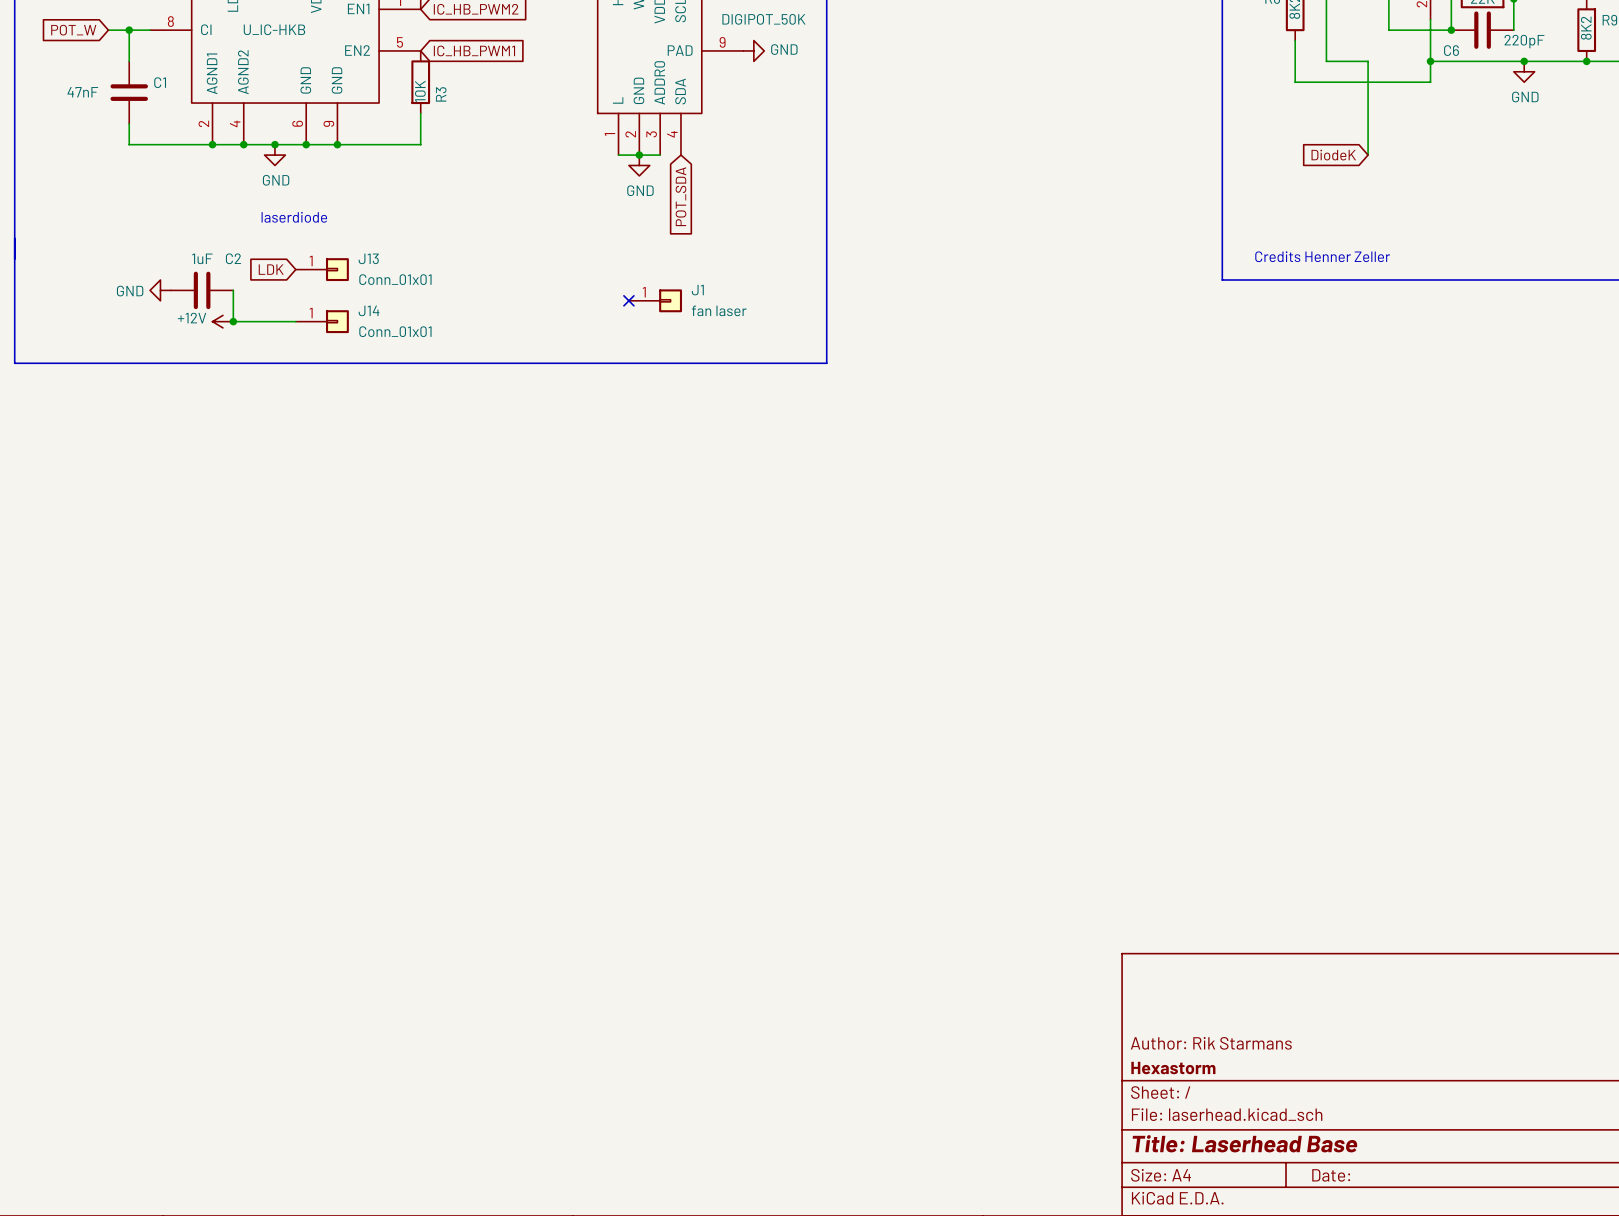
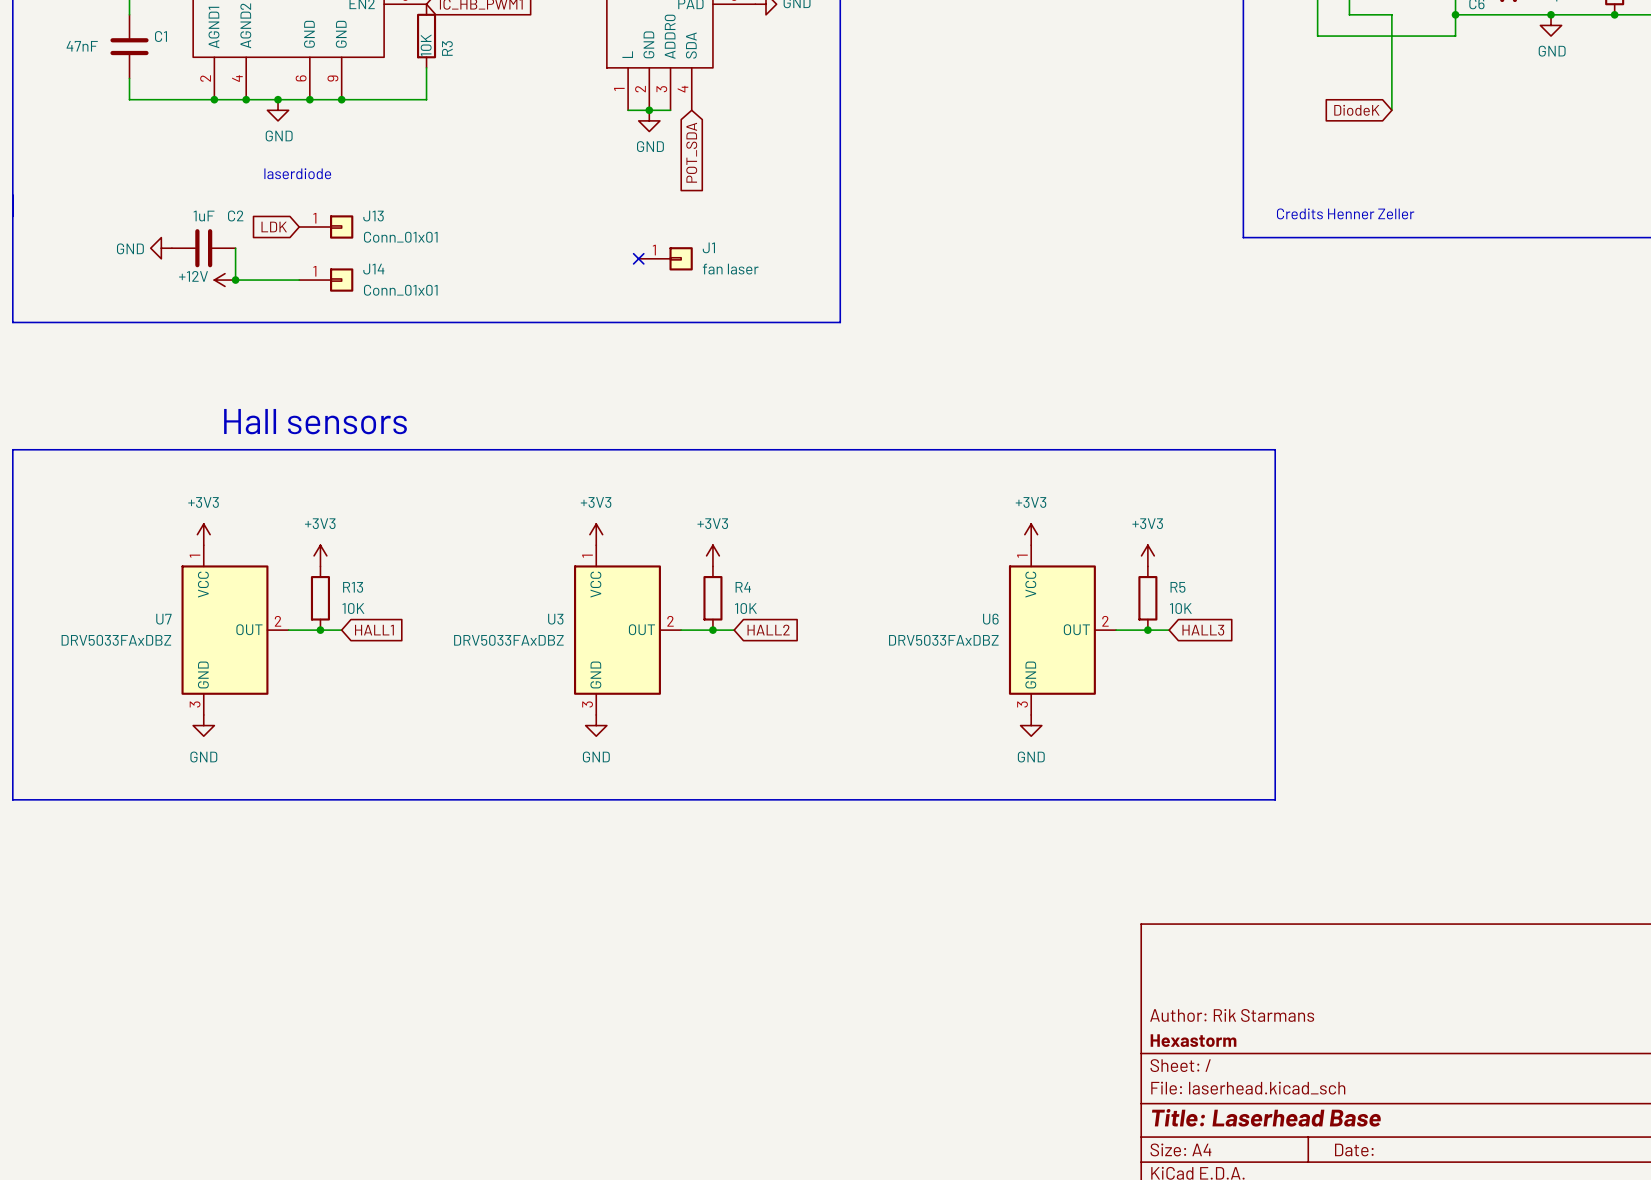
text: none -> Hall sensors (315, 421)
line: none -> (12, 449) (1275, 449) (1275, 799) (12, 799) (12, 449)
power symbol: none -> +3V3 (203, 534)
power symbol: none -> +3V3 (596, 534)
power symbol: none -> +3V3 (1031, 534)
power symbol: none -> +3V3 (320, 555)
power symbol: none -> +3V3 (712, 555)
power symbol: none -> +3V3 (1147, 555)
R13: none -> 10K (320, 598)
R4: none -> 10K (712, 598)
R5: none -> 10K (1147, 598)
U7: none -> DRV5033FAxDBZ (235, 630)
wire: none -> (288, 630) (341, 630)
junction: none -> (320, 630)
global label: none -> HALL1 (374, 630)
U3: none -> DRV5033FAxDBZ (627, 630)
wire: none -> (681, 630) (734, 630)
junction: none -> (712, 630)
global label: none -> HALL2 (768, 630)
U6: none -> DRV5033FAxDBZ (1062, 630)
wire: none -> (1116, 630) (1169, 630)
junction: none -> (1147, 630)
global label: none -> HALL3 (1203, 630)
power symbol: none -> GND (203, 725)
power symbol: none -> GND (596, 725)
power symbol: none -> GND (1031, 725)

